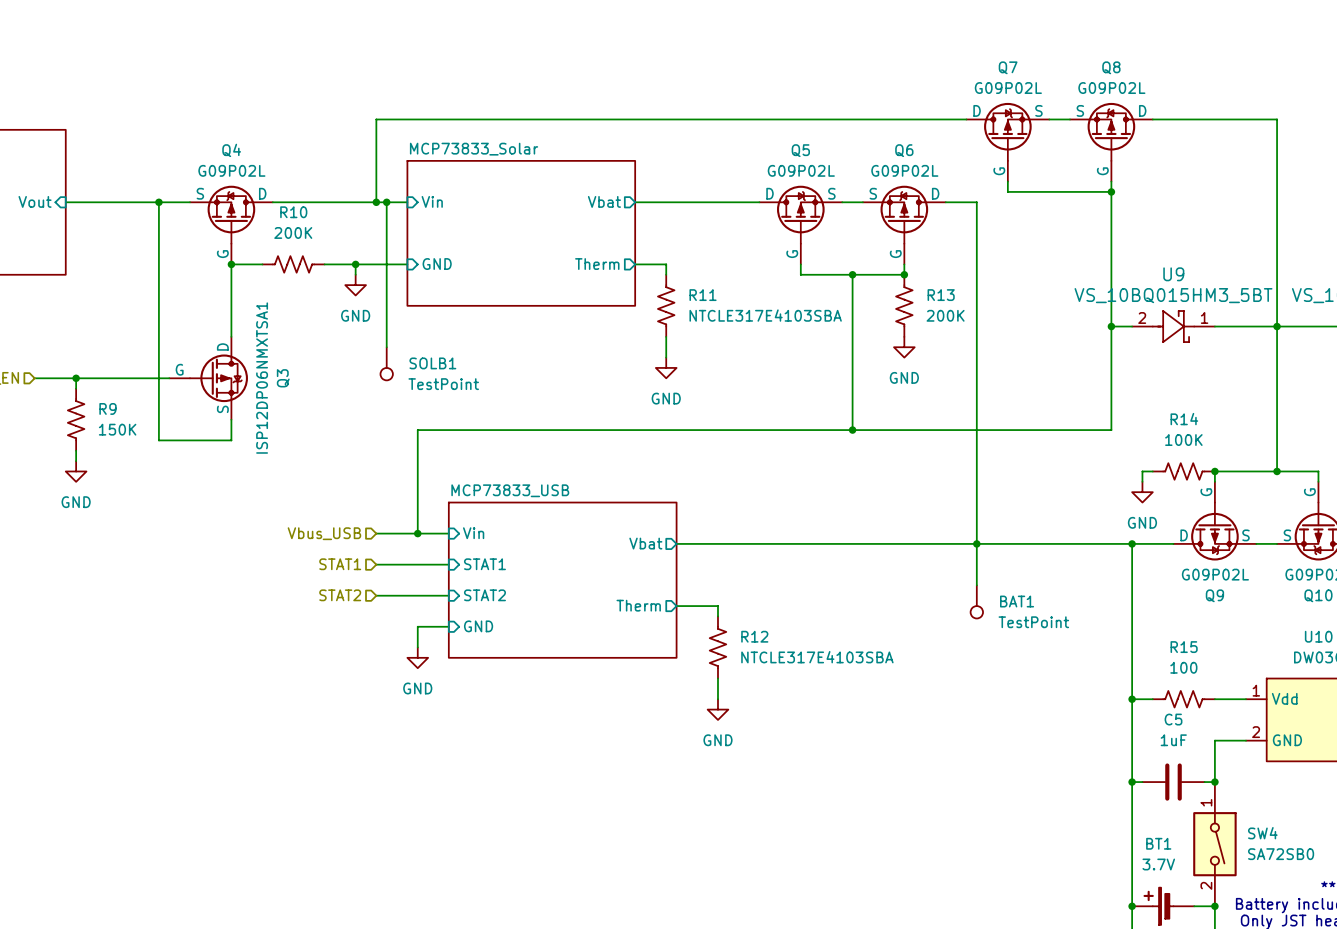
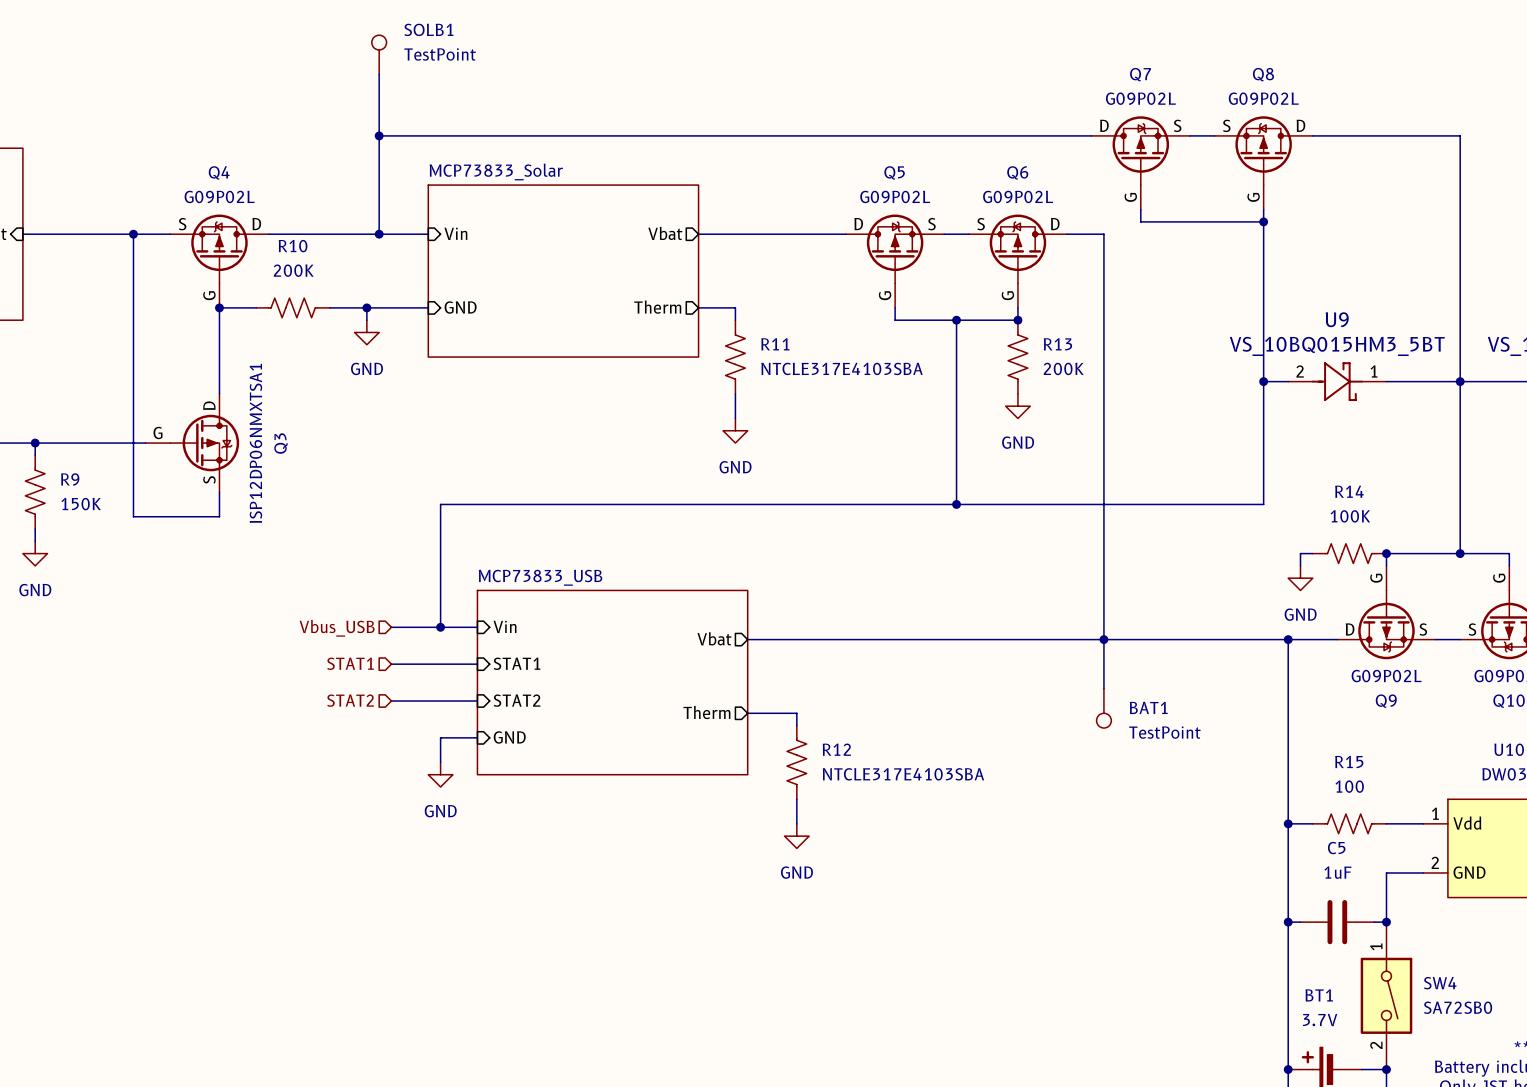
wire: none -> (379, 74) (379, 234)
junction: none -> (379, 135)
wire: (376, 119) (376, 202) -> (391, 135) (379, 135)
junction: none -> (379, 234)
junction: (376, 202) -> none
wire: (386, 202) (386, 347) -> none
junction: (386, 202) -> none
SOLB1 position: (386, 363) -> (379, 54)
SOLB1 name position: SOLB1 (432, 363) -> SOLB1 (428, 29)
SOLB1 rotation: 0° (386, 374) -> 180° (379, 42)
SOLB1 value position: TestPoint (443, 384) -> TestPoint (440, 54)

